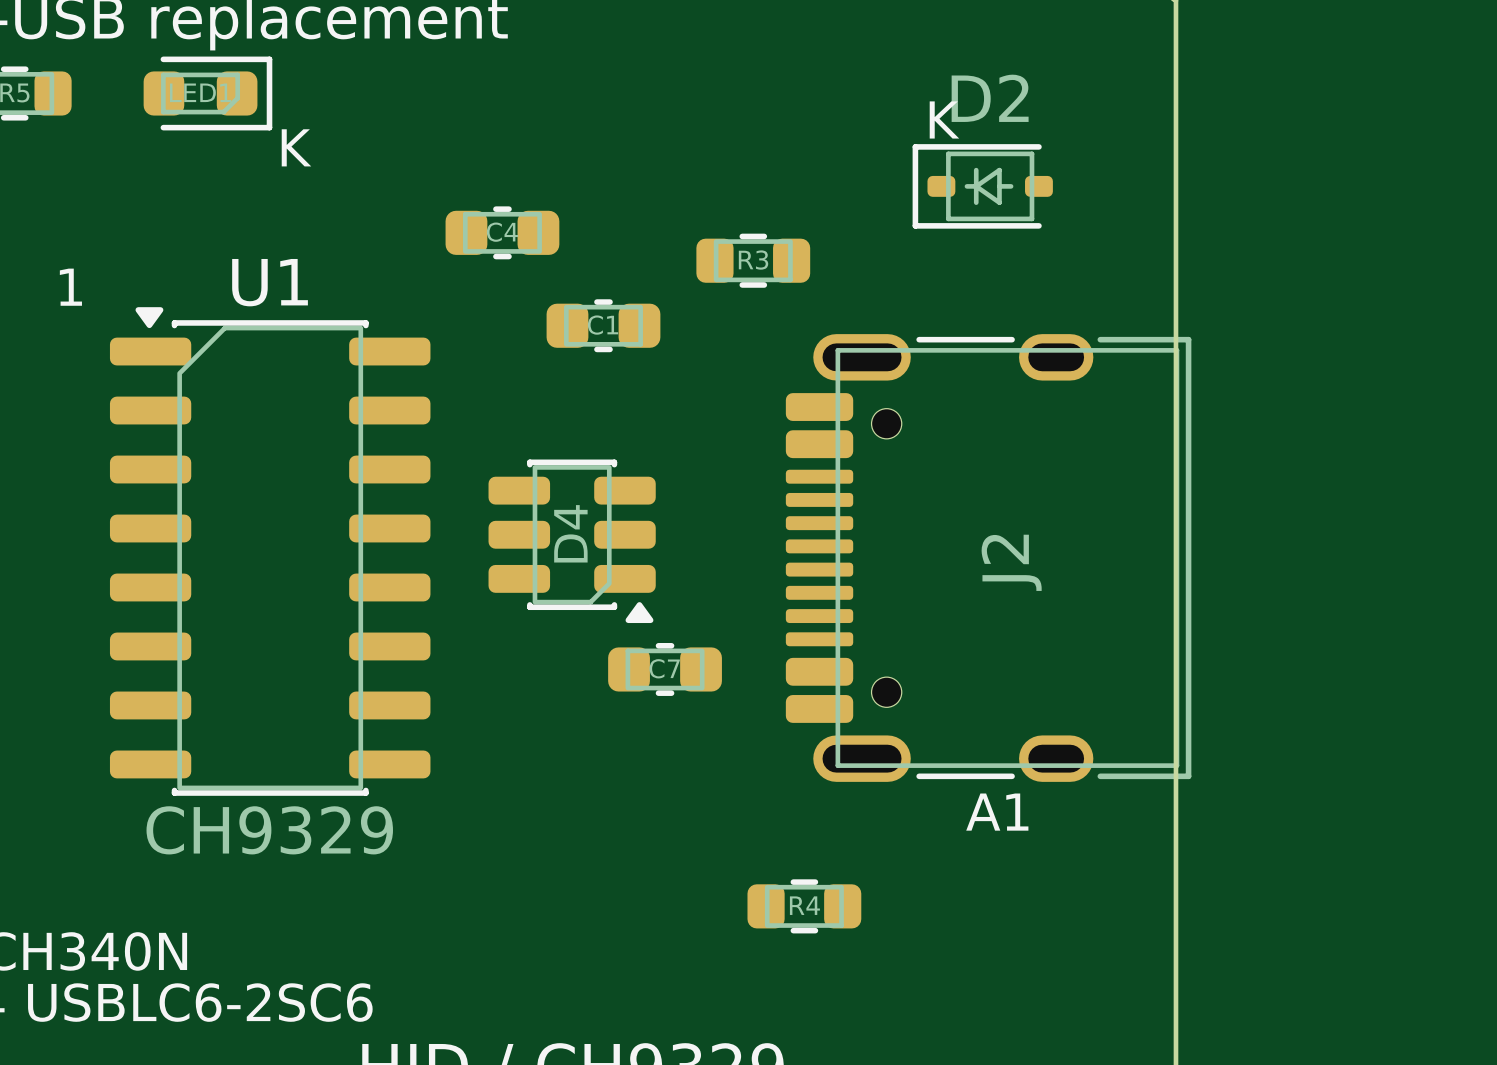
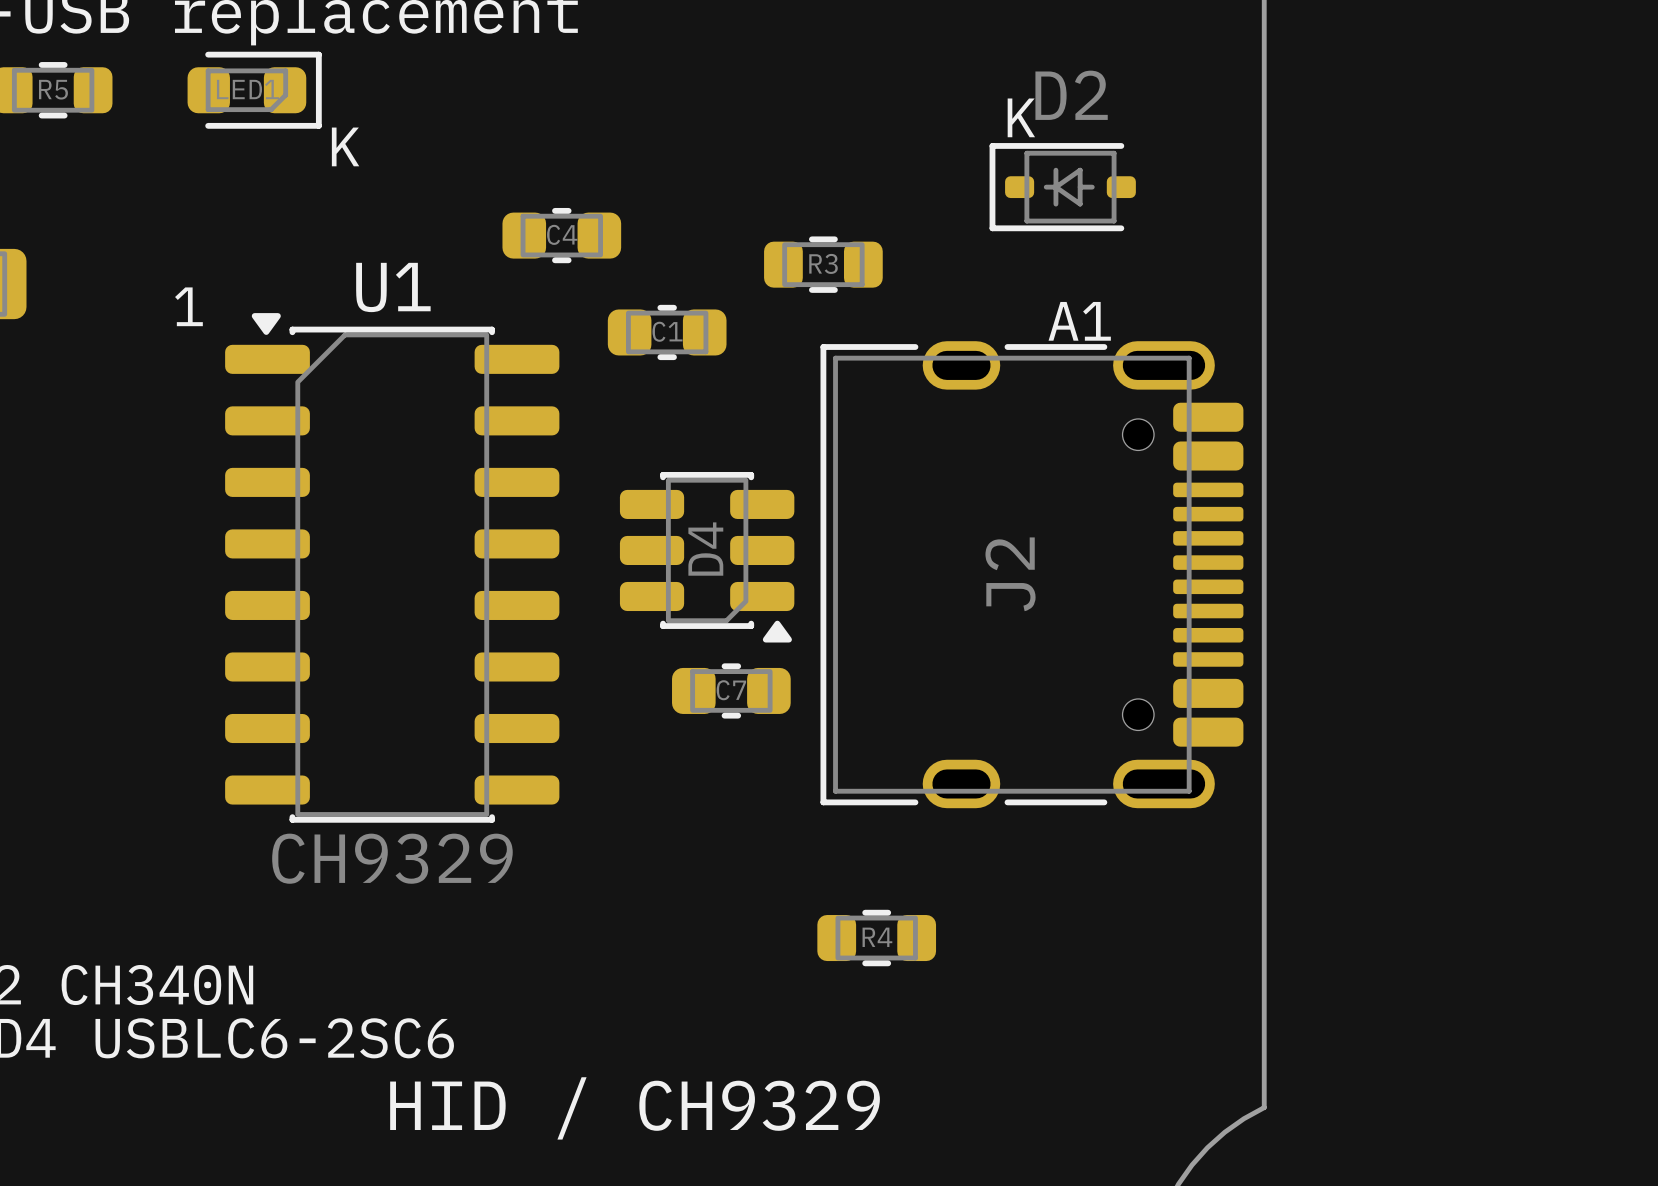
text position: 1 (70, 287) -> 1 (188, 306)
J2 footprint: [785, 334, 1192, 782] -> [820, 341, 1244, 809]
D4 position: (572, 541) -> (707, 557)
U1 position: (270, 551) -> (392, 567)
text position: A1 (997, 812) -> A1 (1079, 321)

